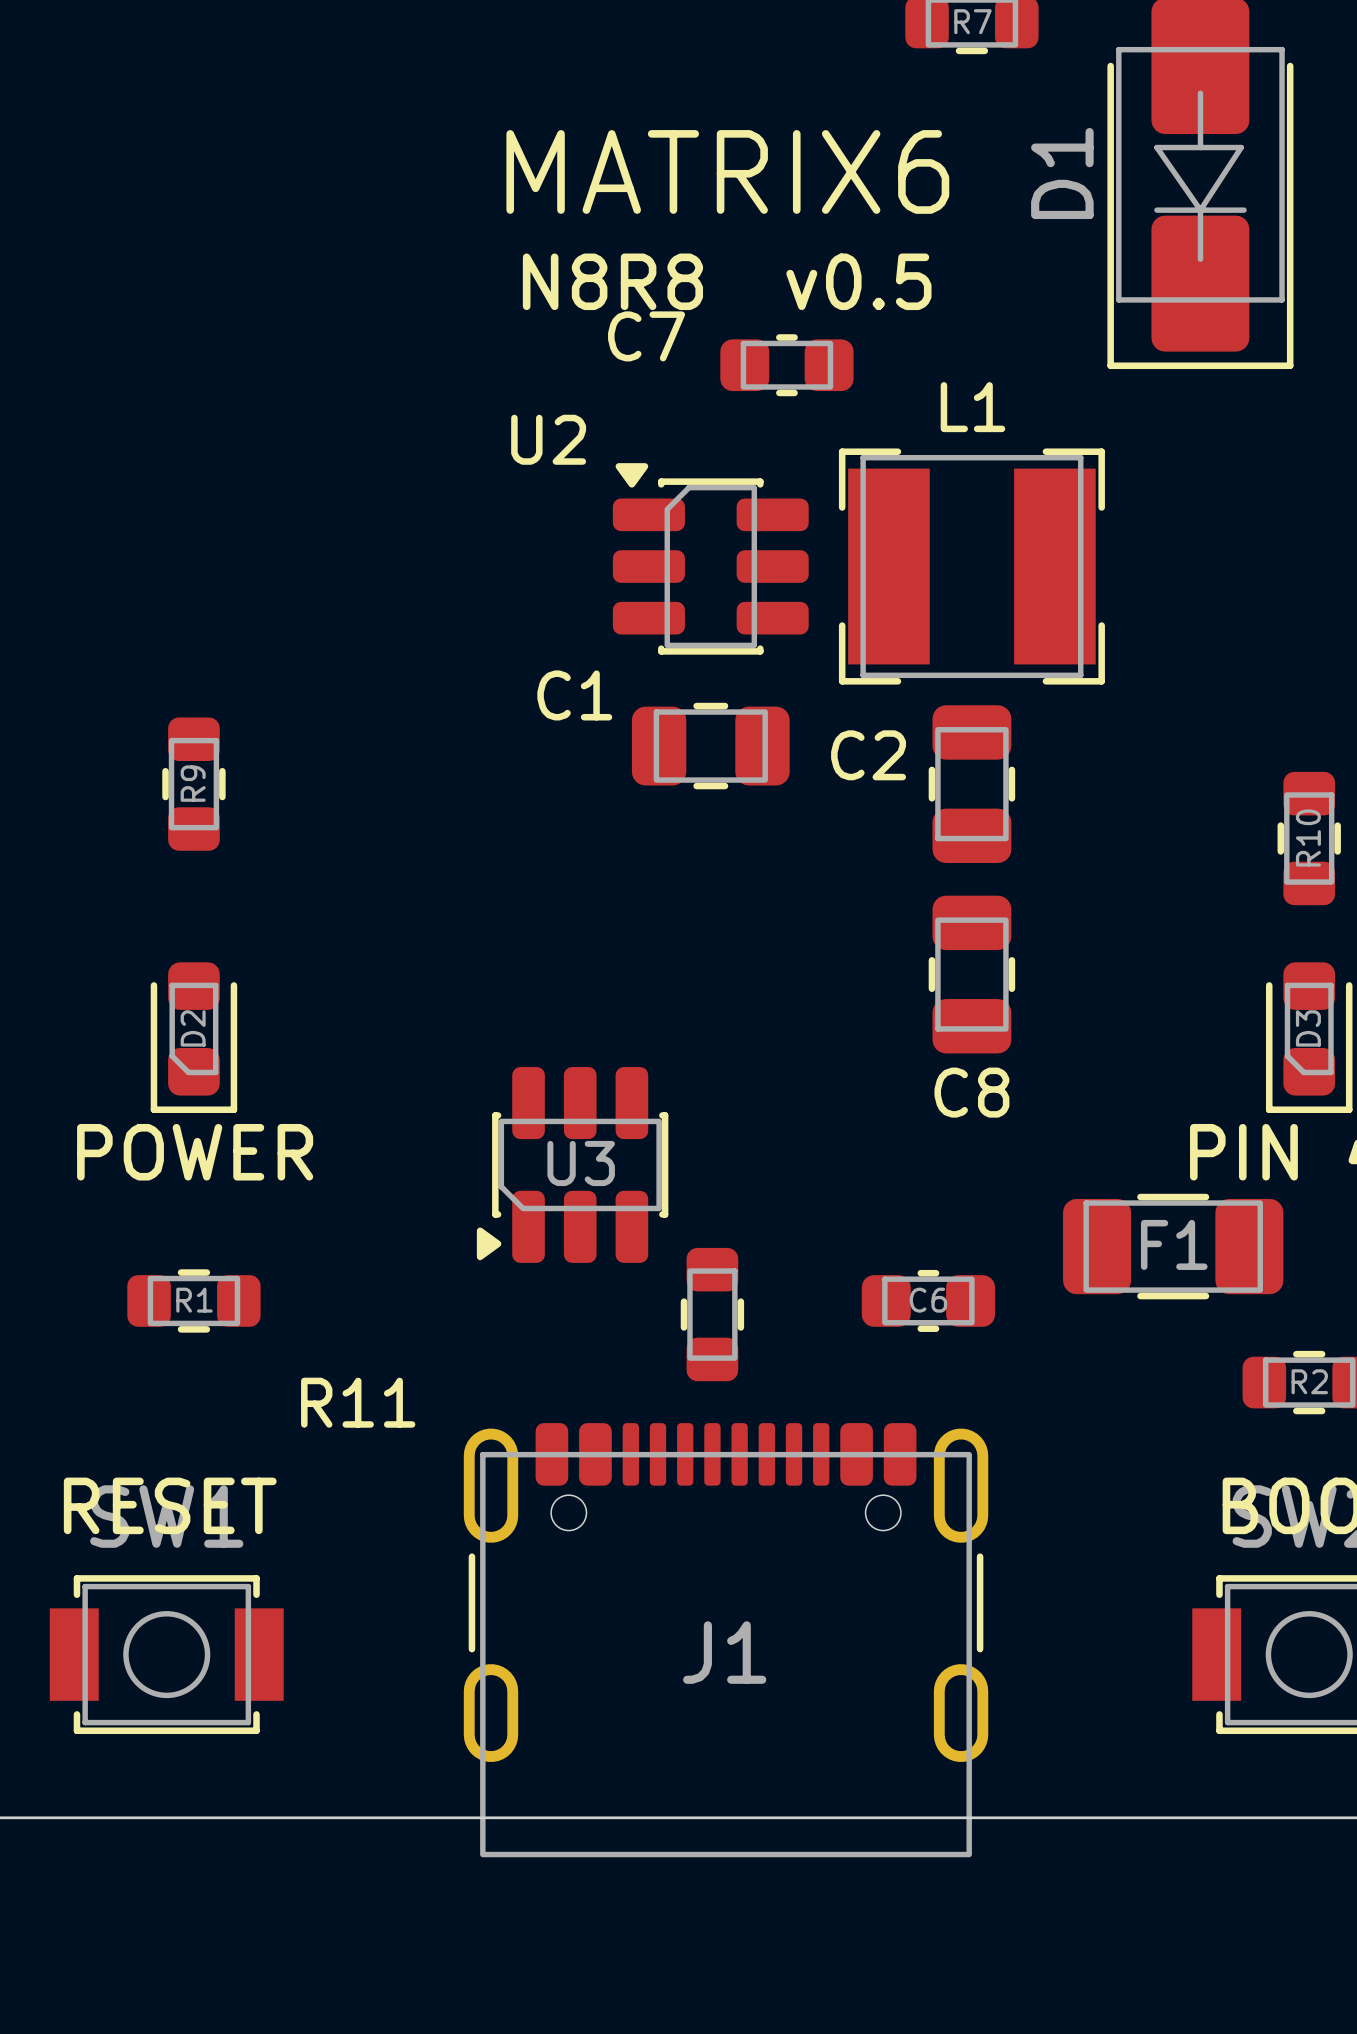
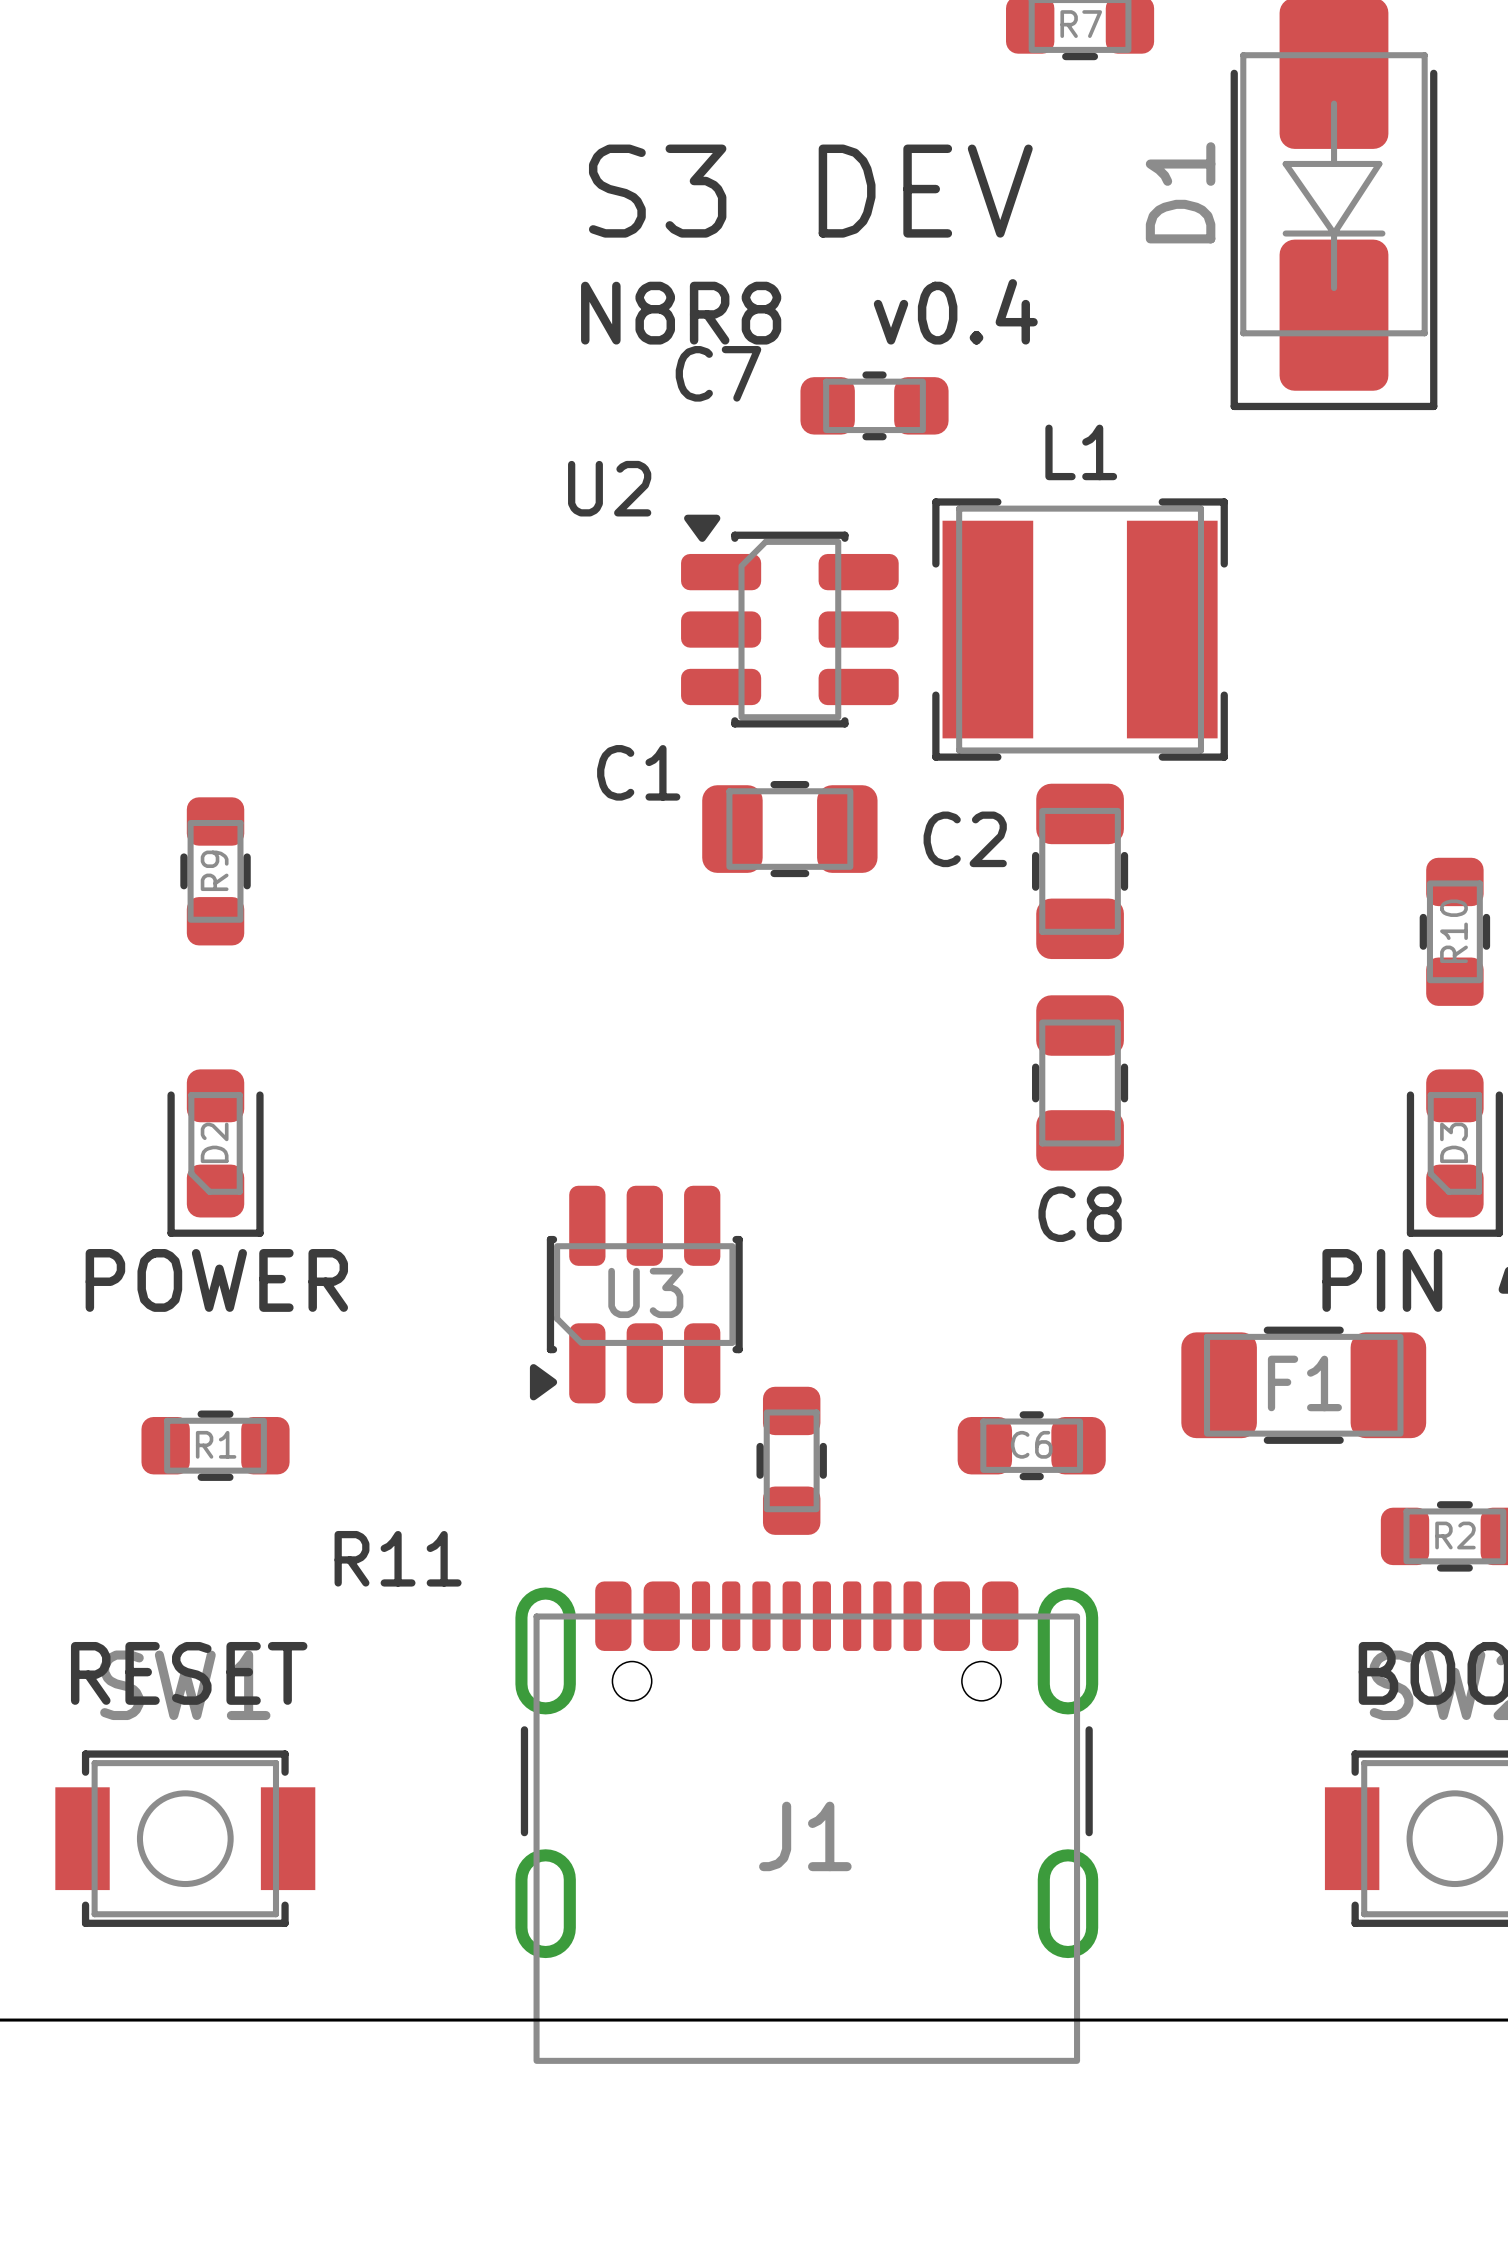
text: MATRIX6 (727, 171) -> S3 DEV (810, 191)
text: N8R8 v0.5 (727, 281) -> N8R8 v0.4 (809, 311)

